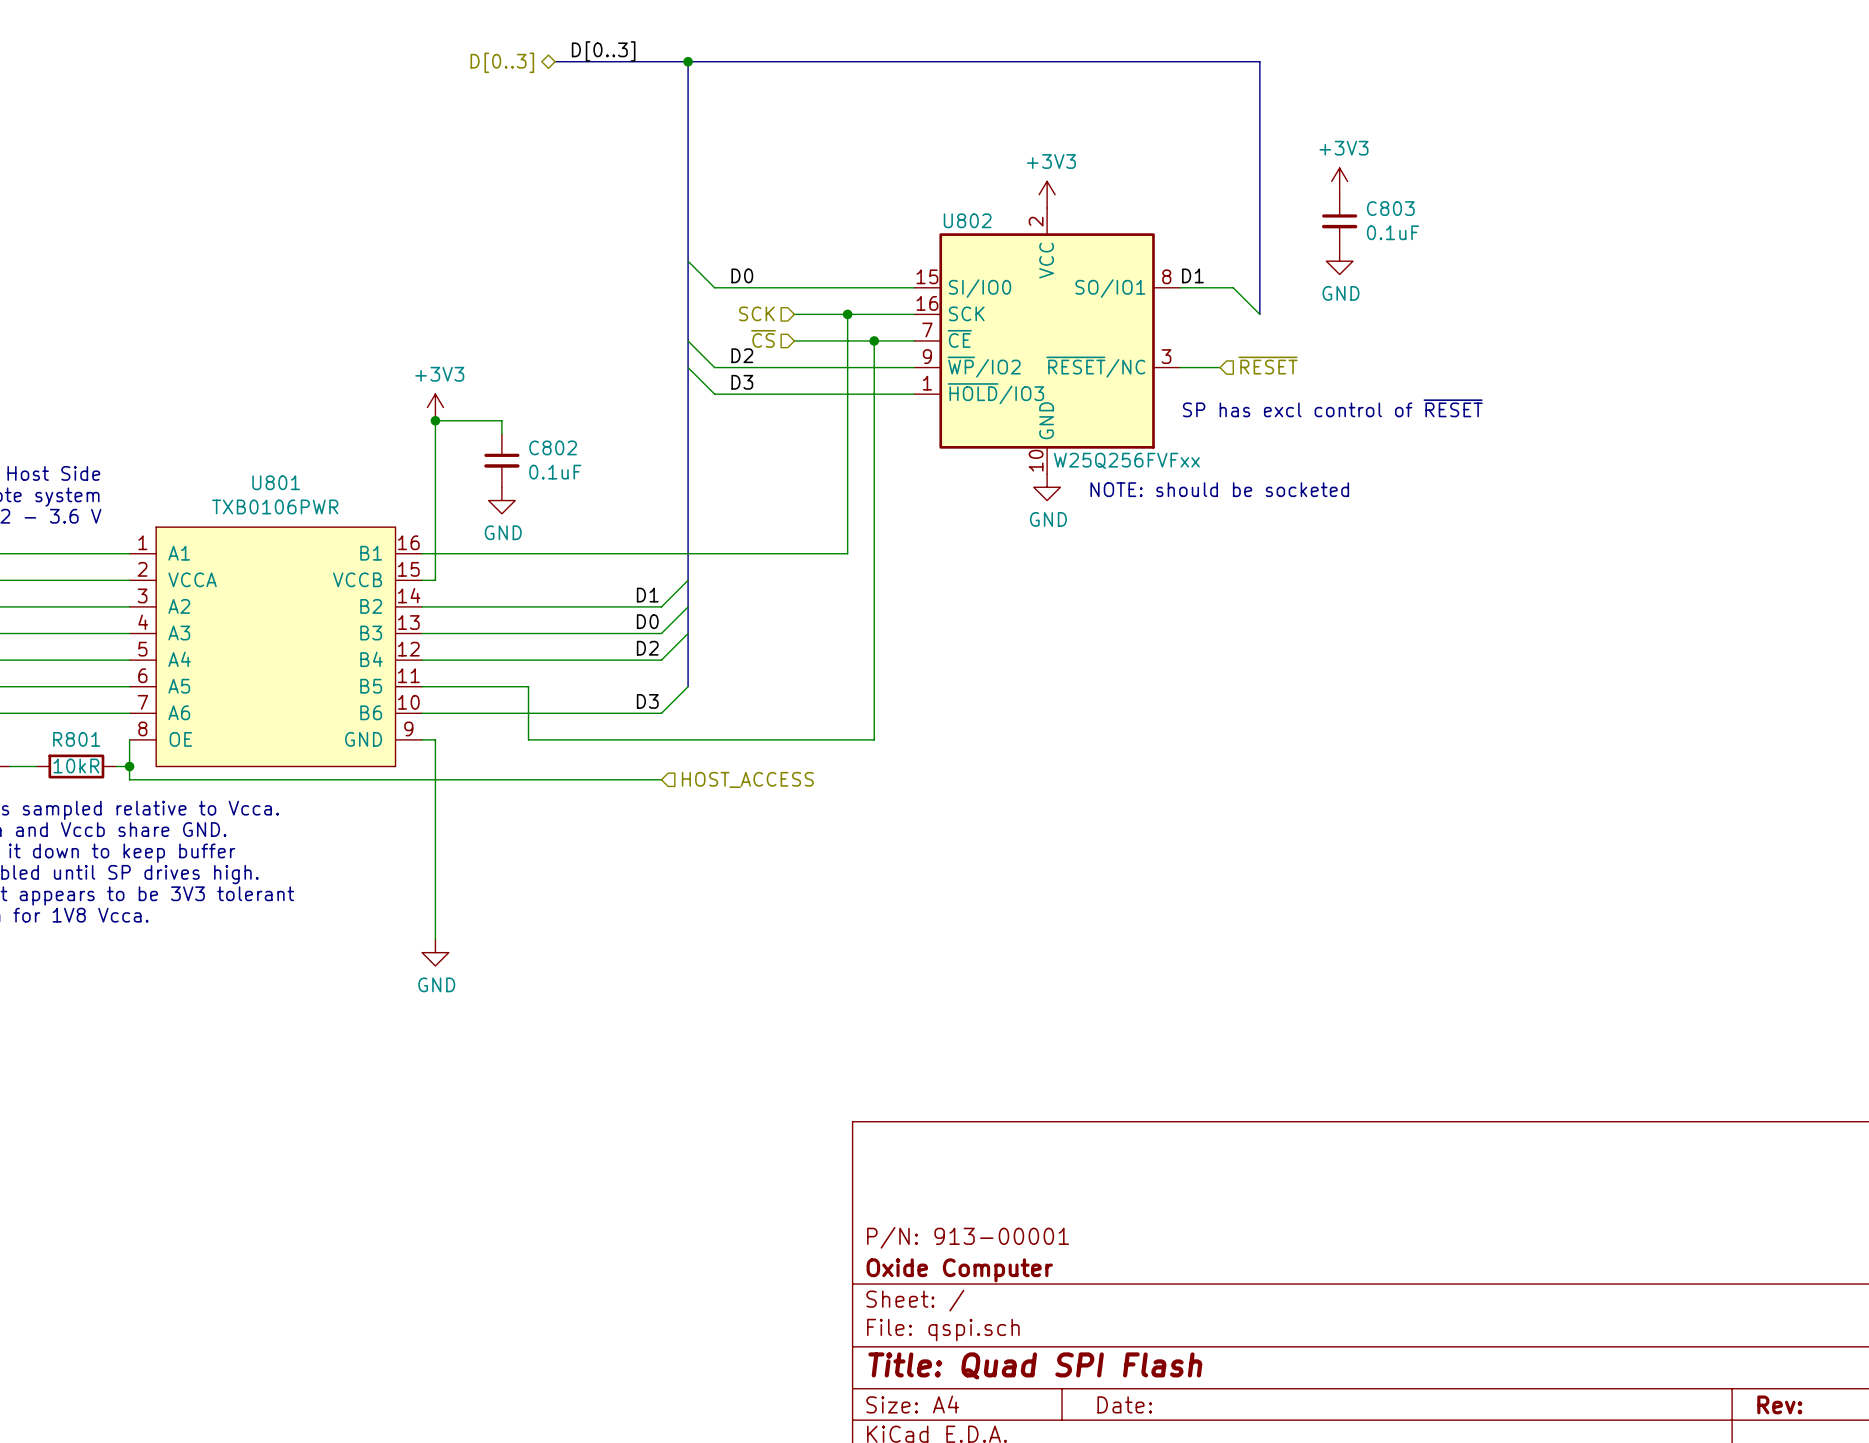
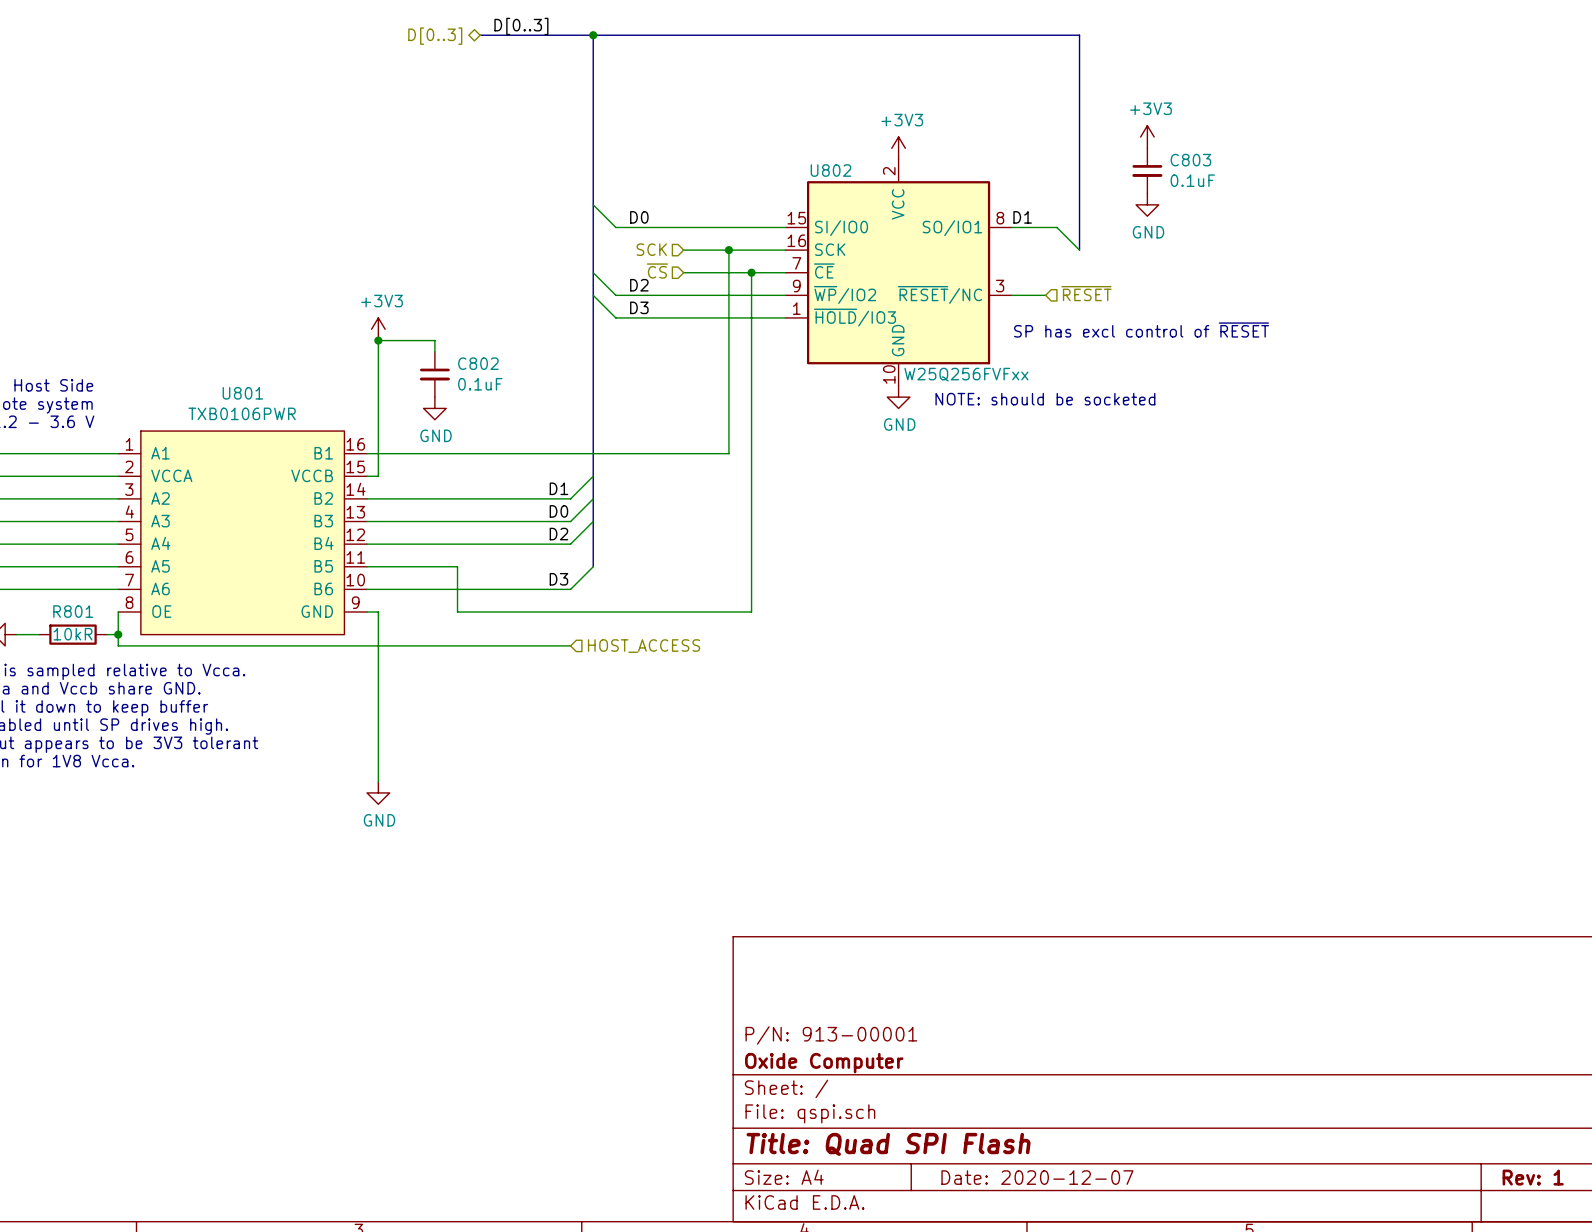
title block: Date: (1124, 1404) -> Date: 2020-12-07 (1037, 1177)
title block: Rev: (1779, 1404) -> Rev: 1 (1533, 1177)

